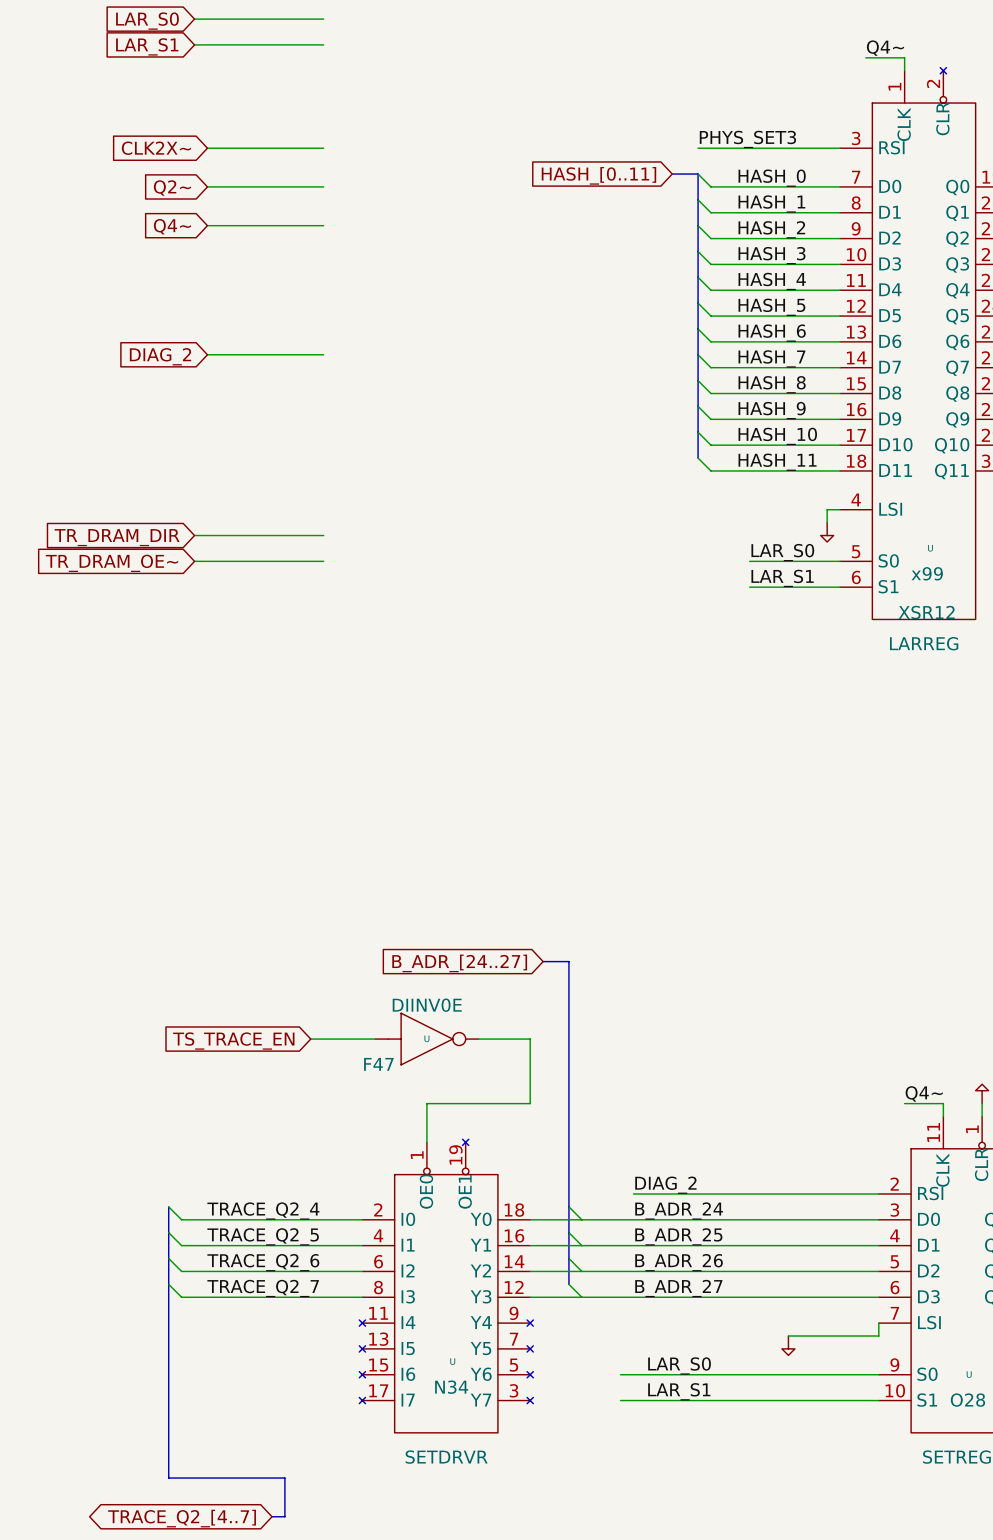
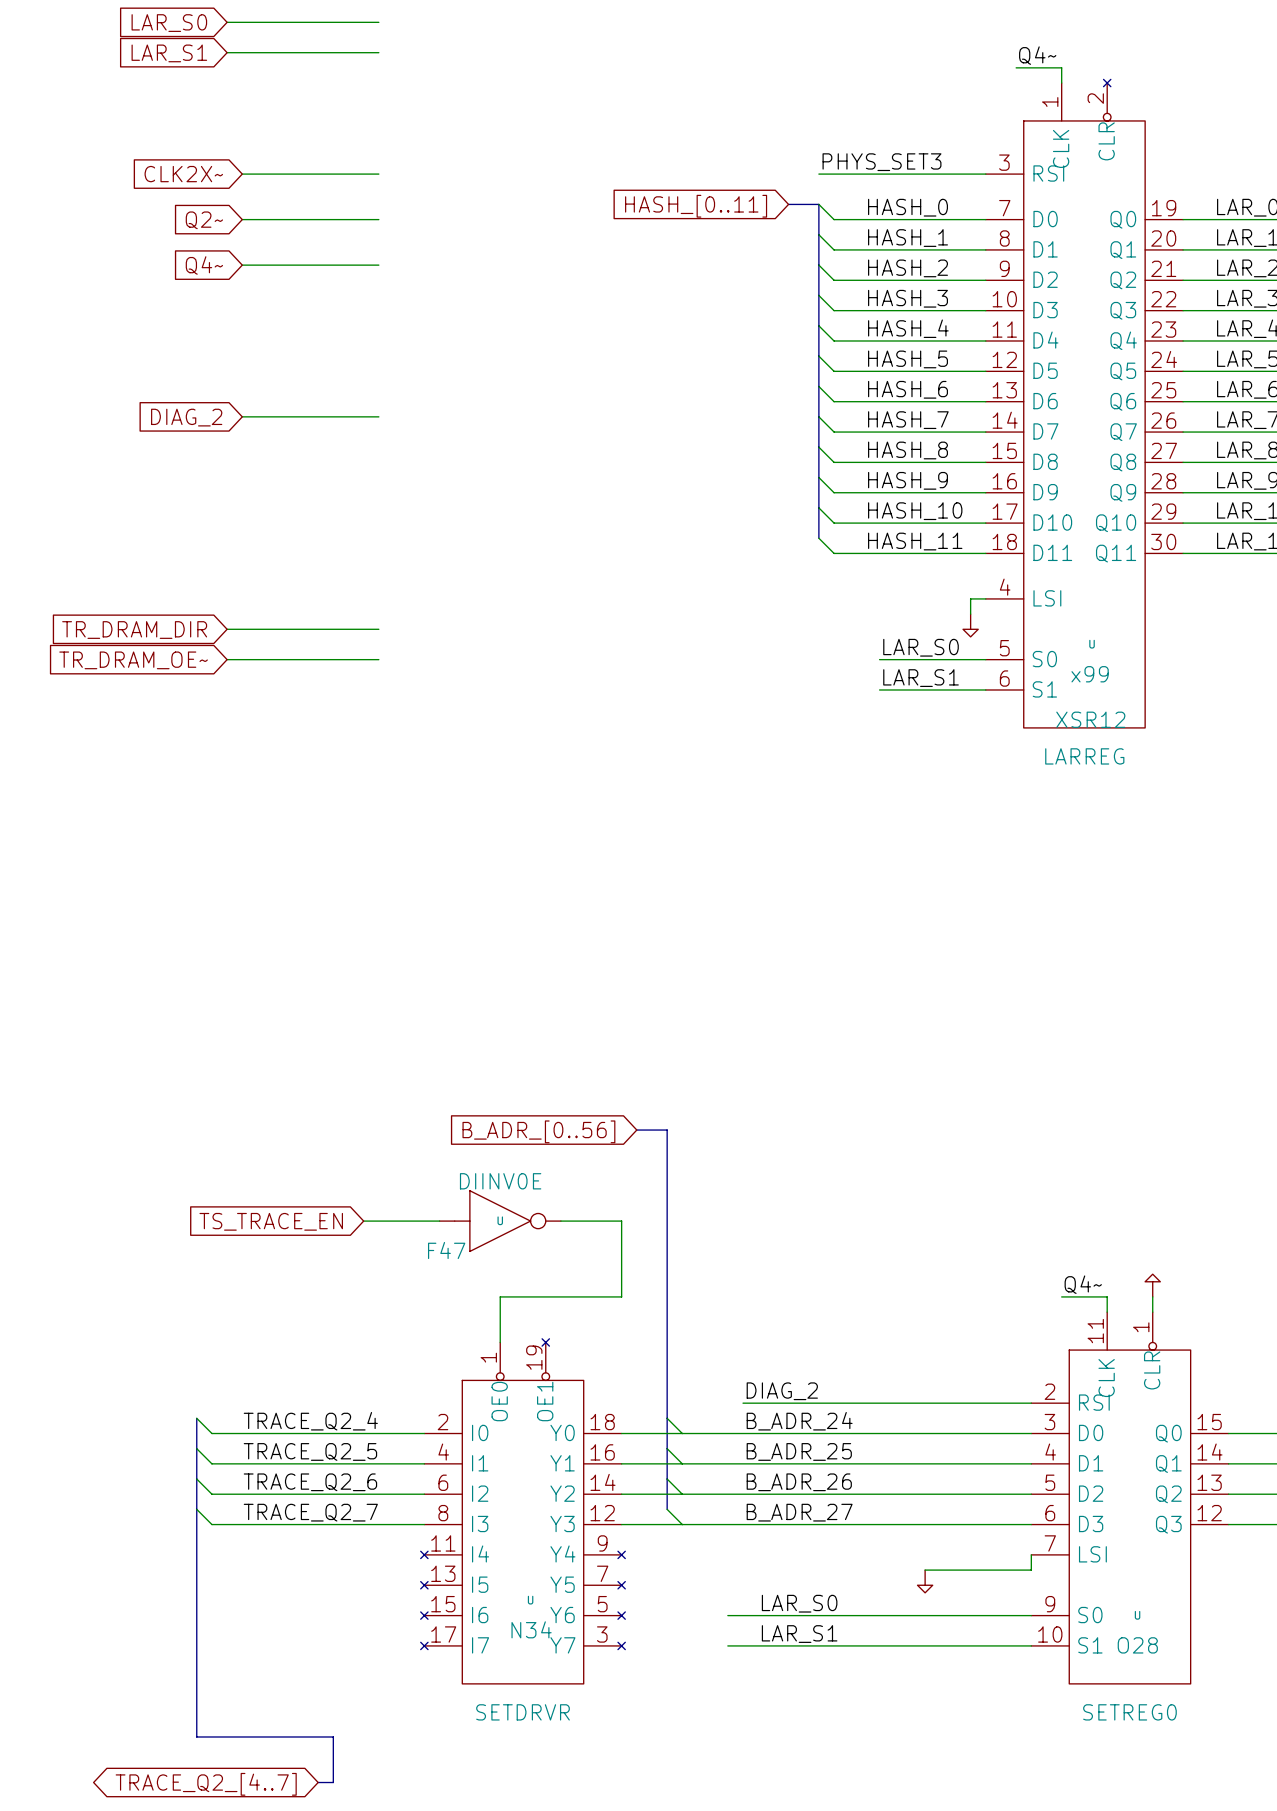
global label: B_ADR_[24..27] (459, 963) -> B_ADR_[0..56] (538, 1131)

